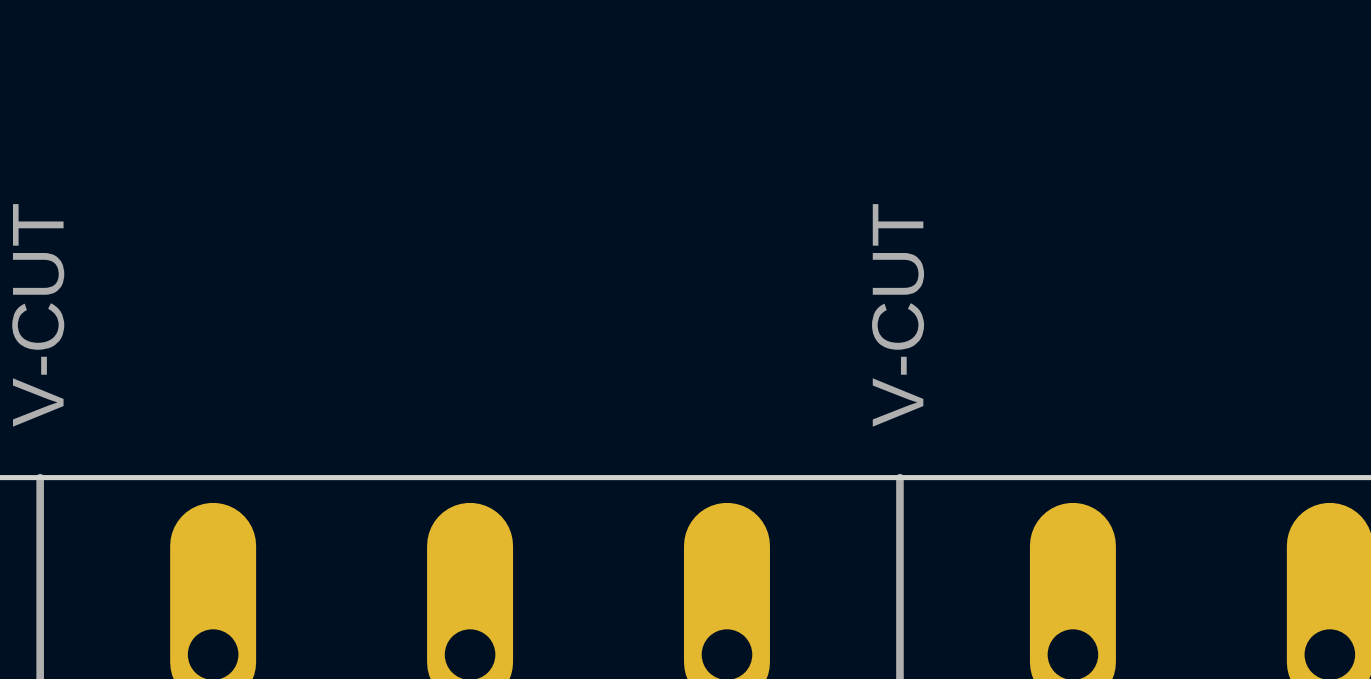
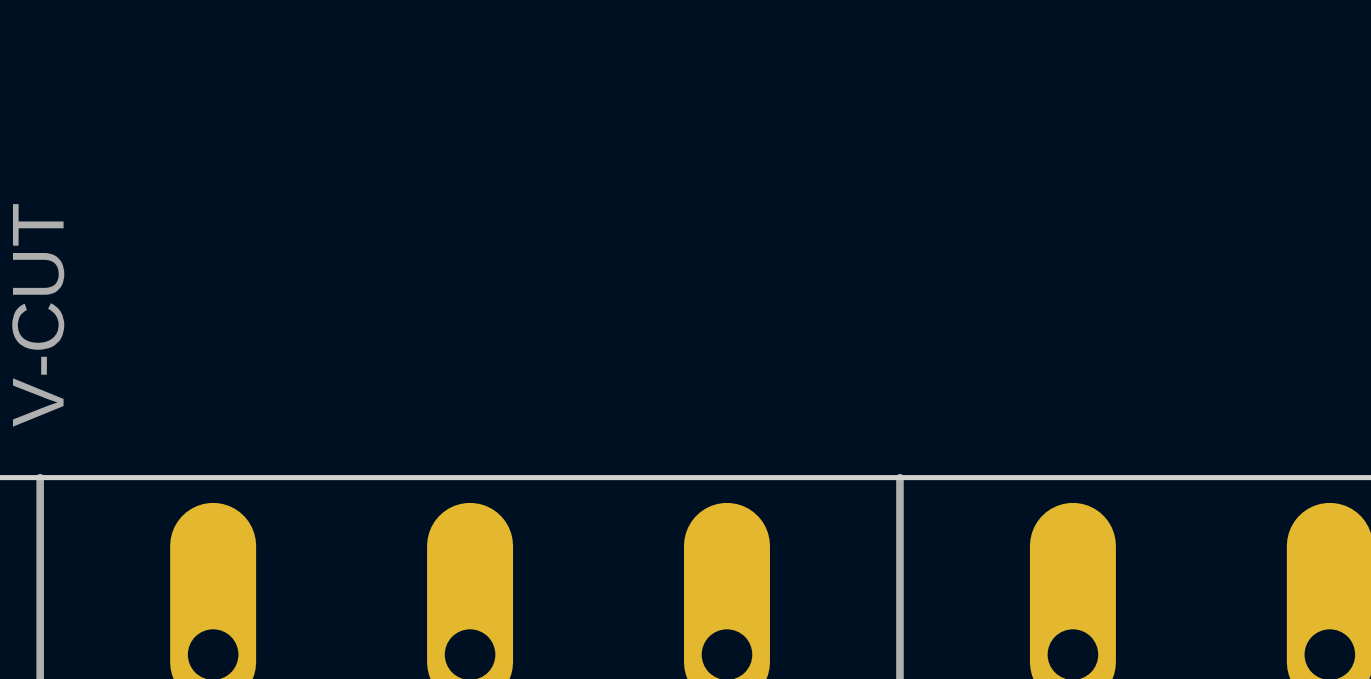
text: V-CUT (898, 315) -> none

